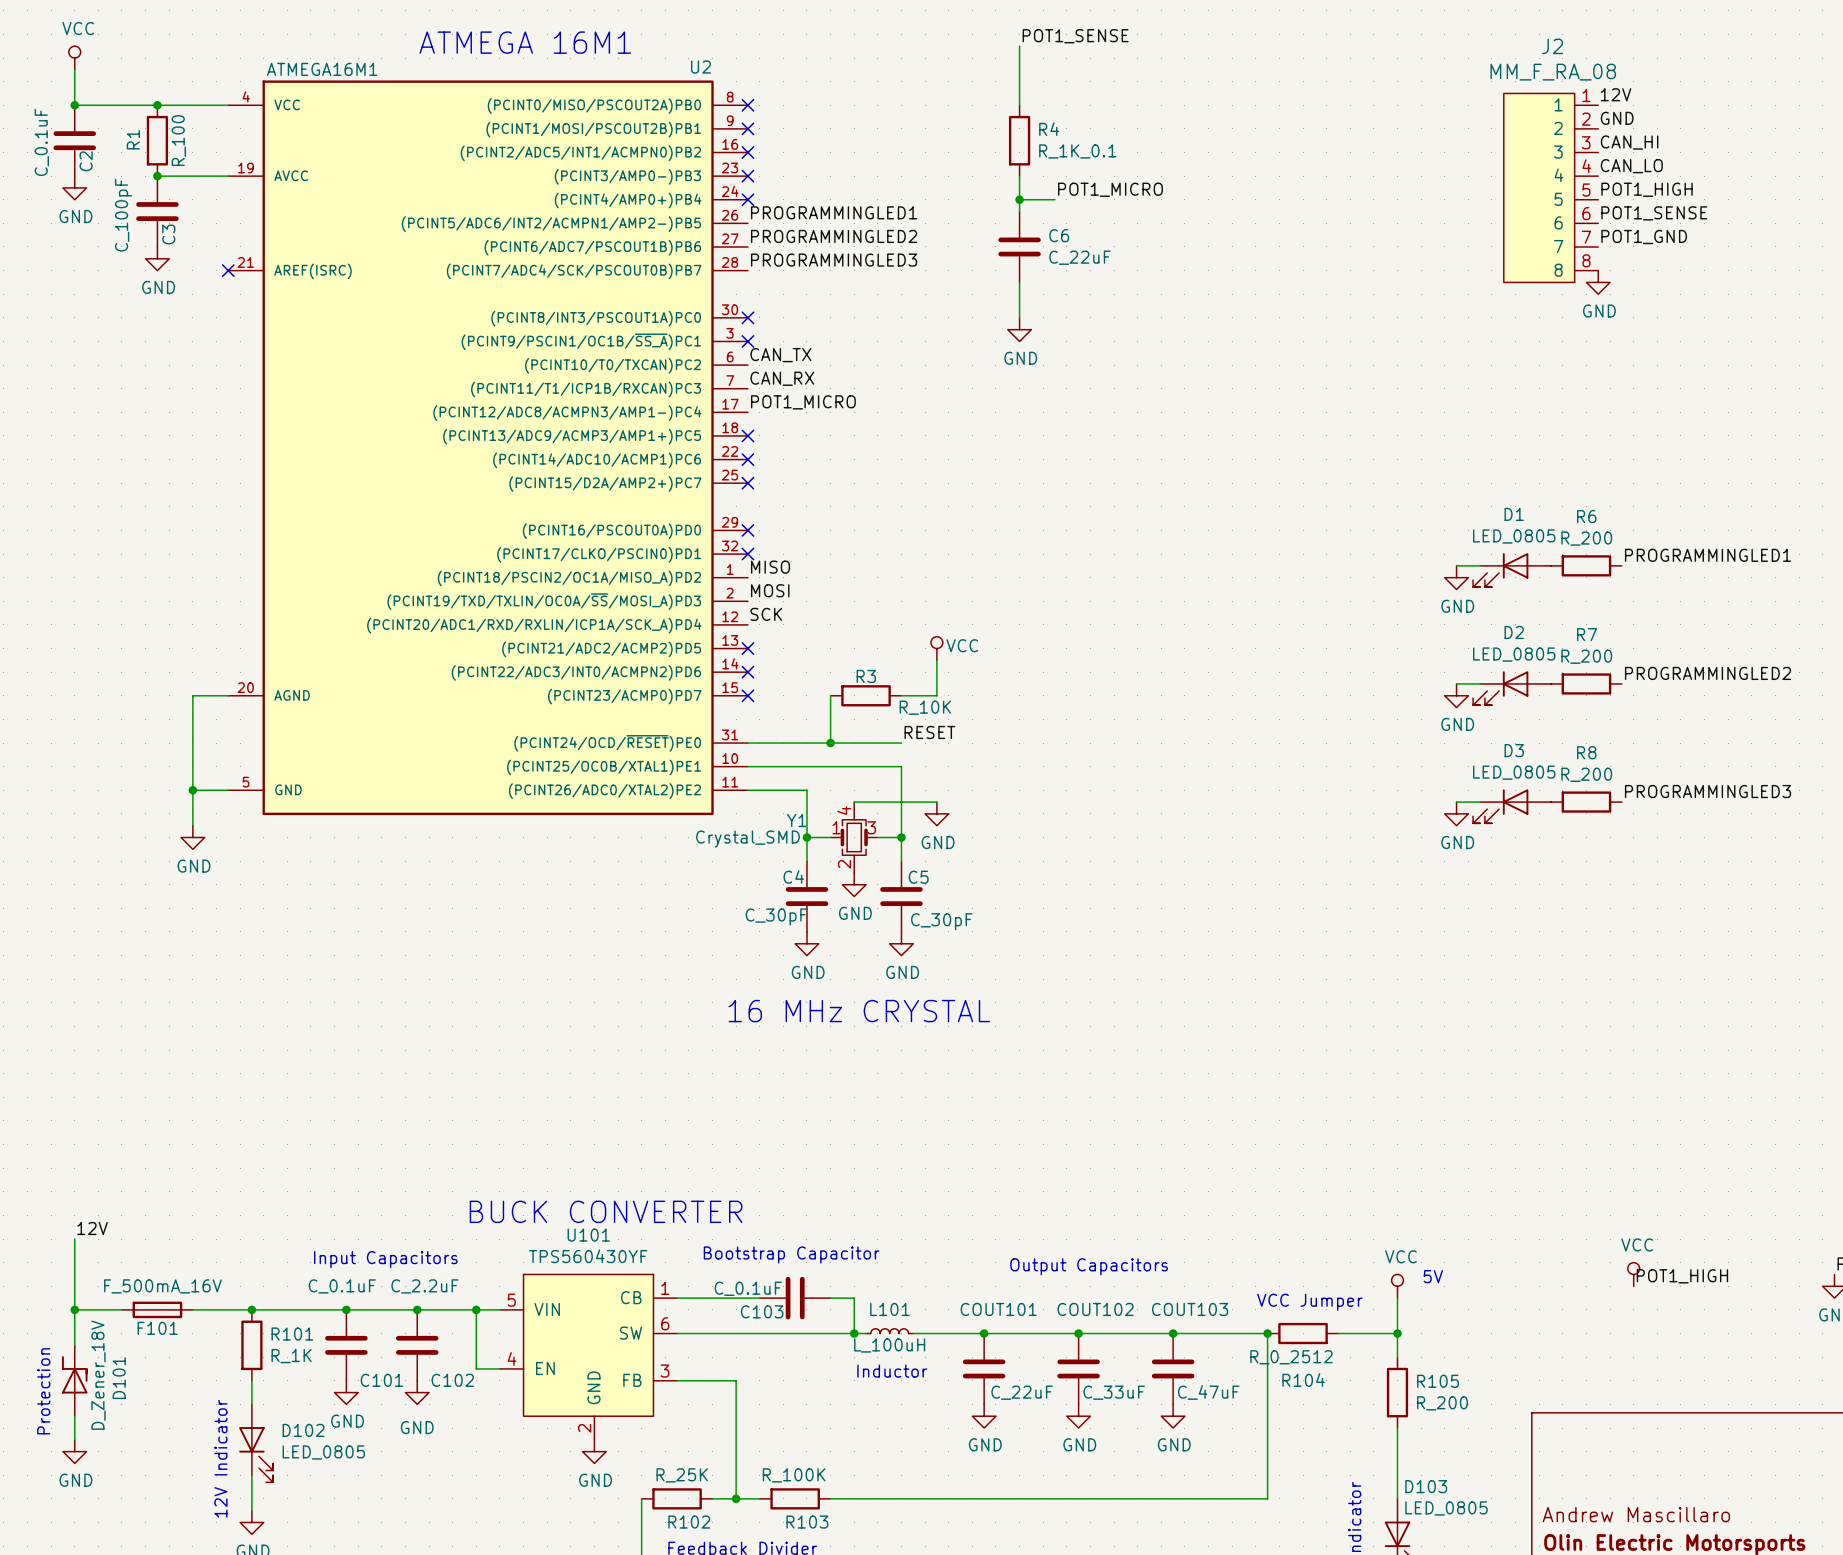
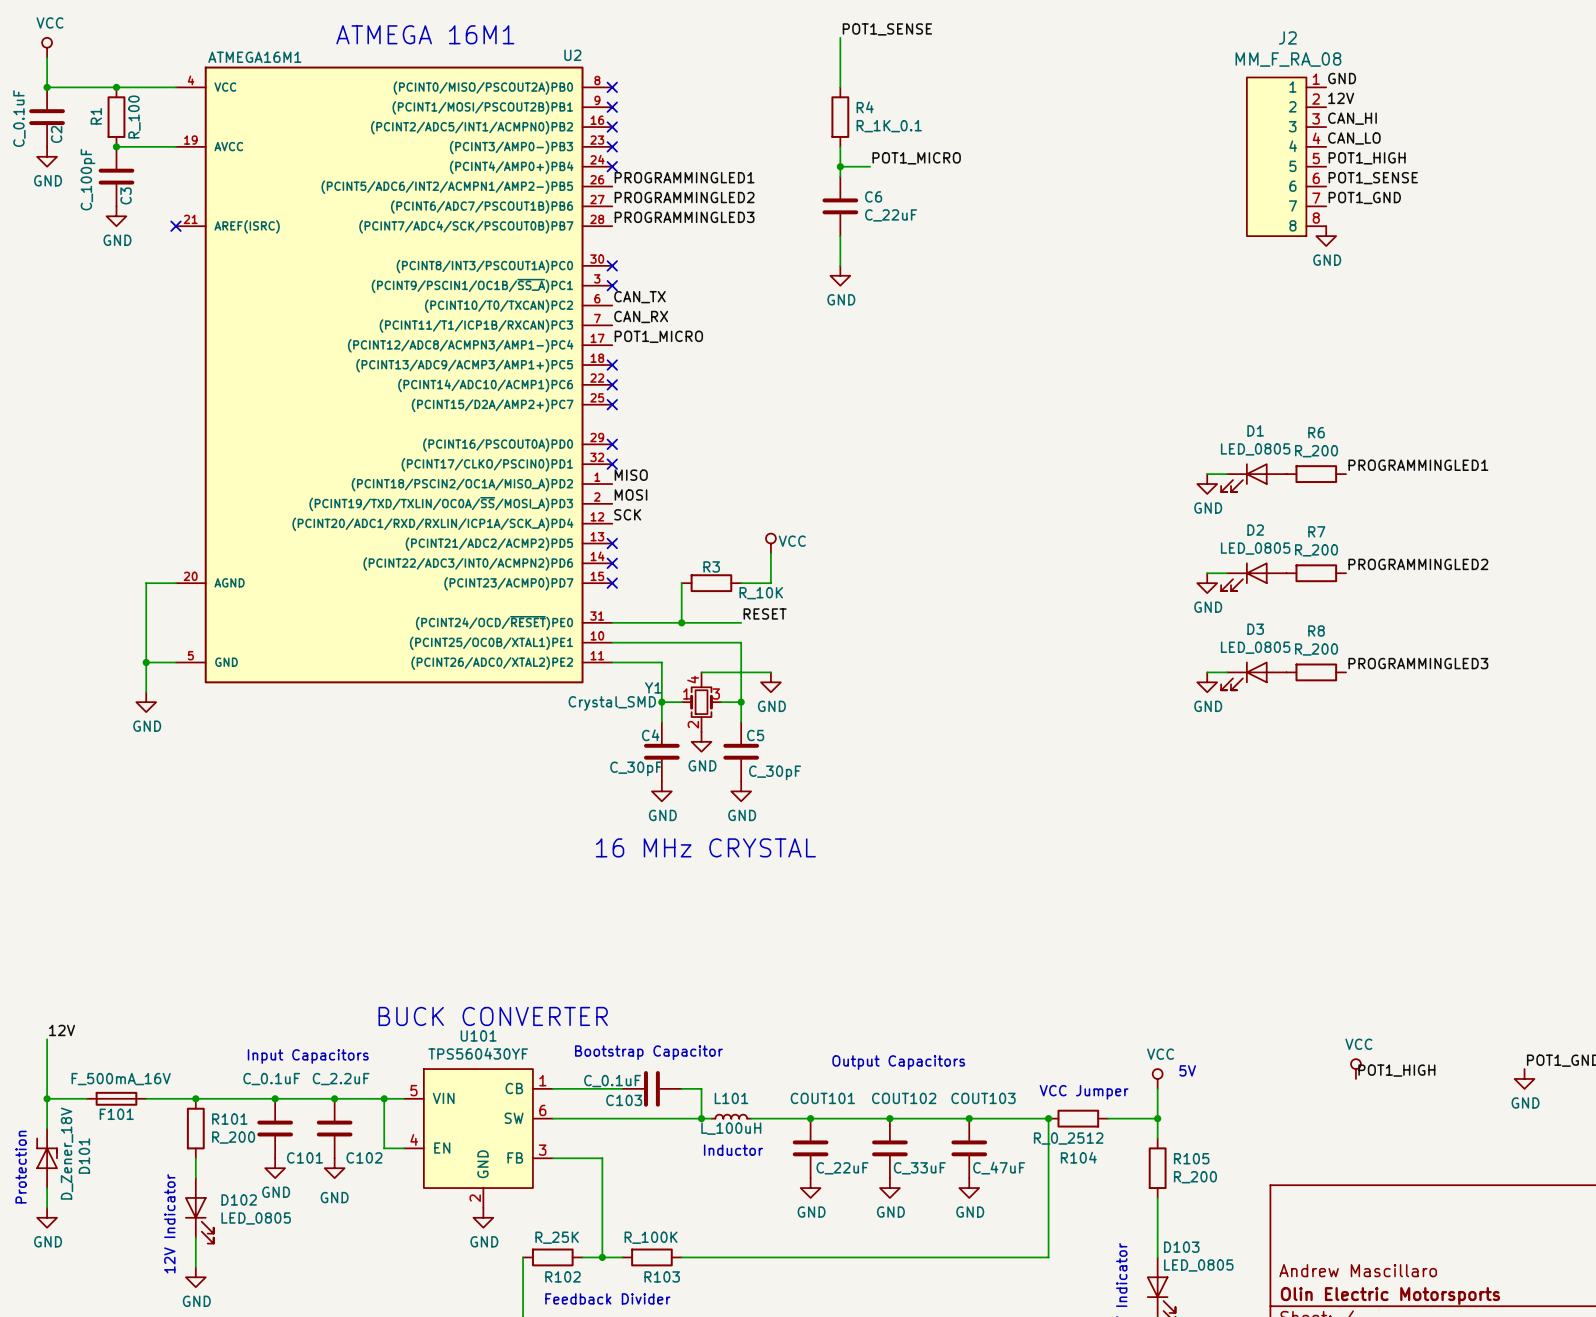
label: 12V (1616, 94) -> GND (1342, 78)
label: GND (1617, 118) -> 12V (1341, 98)
R101 value: R_1K (291, 1356) -> R_200 (233, 1137)

